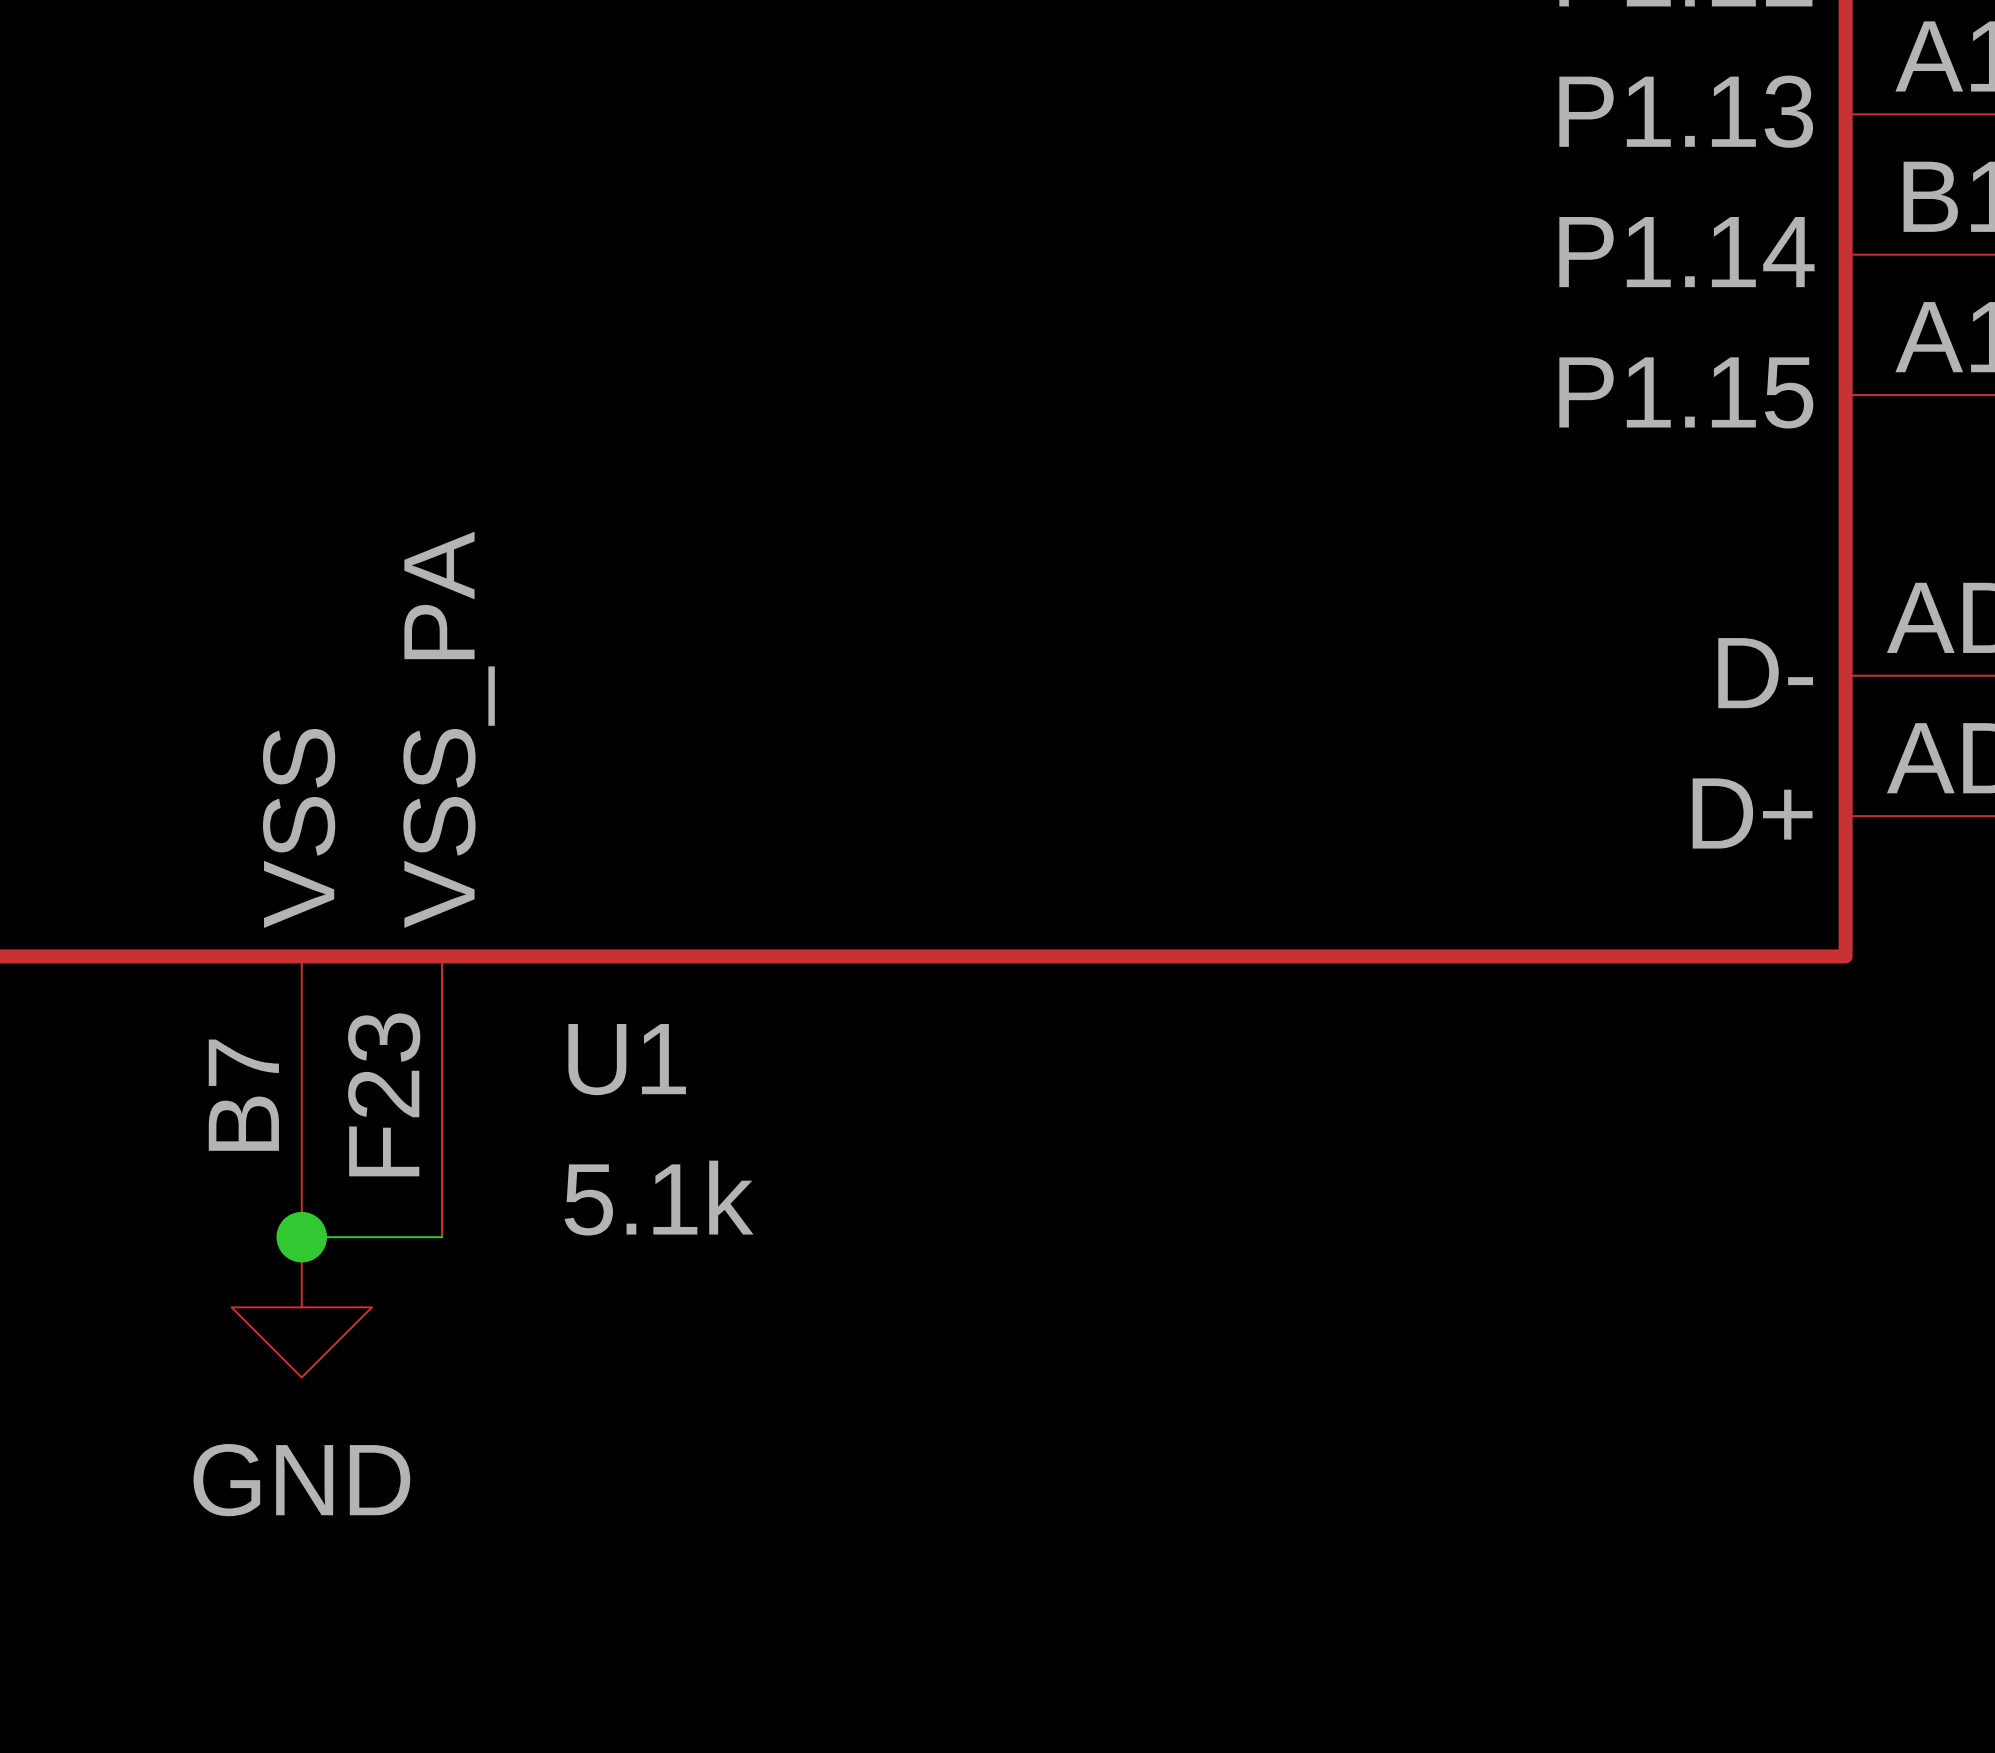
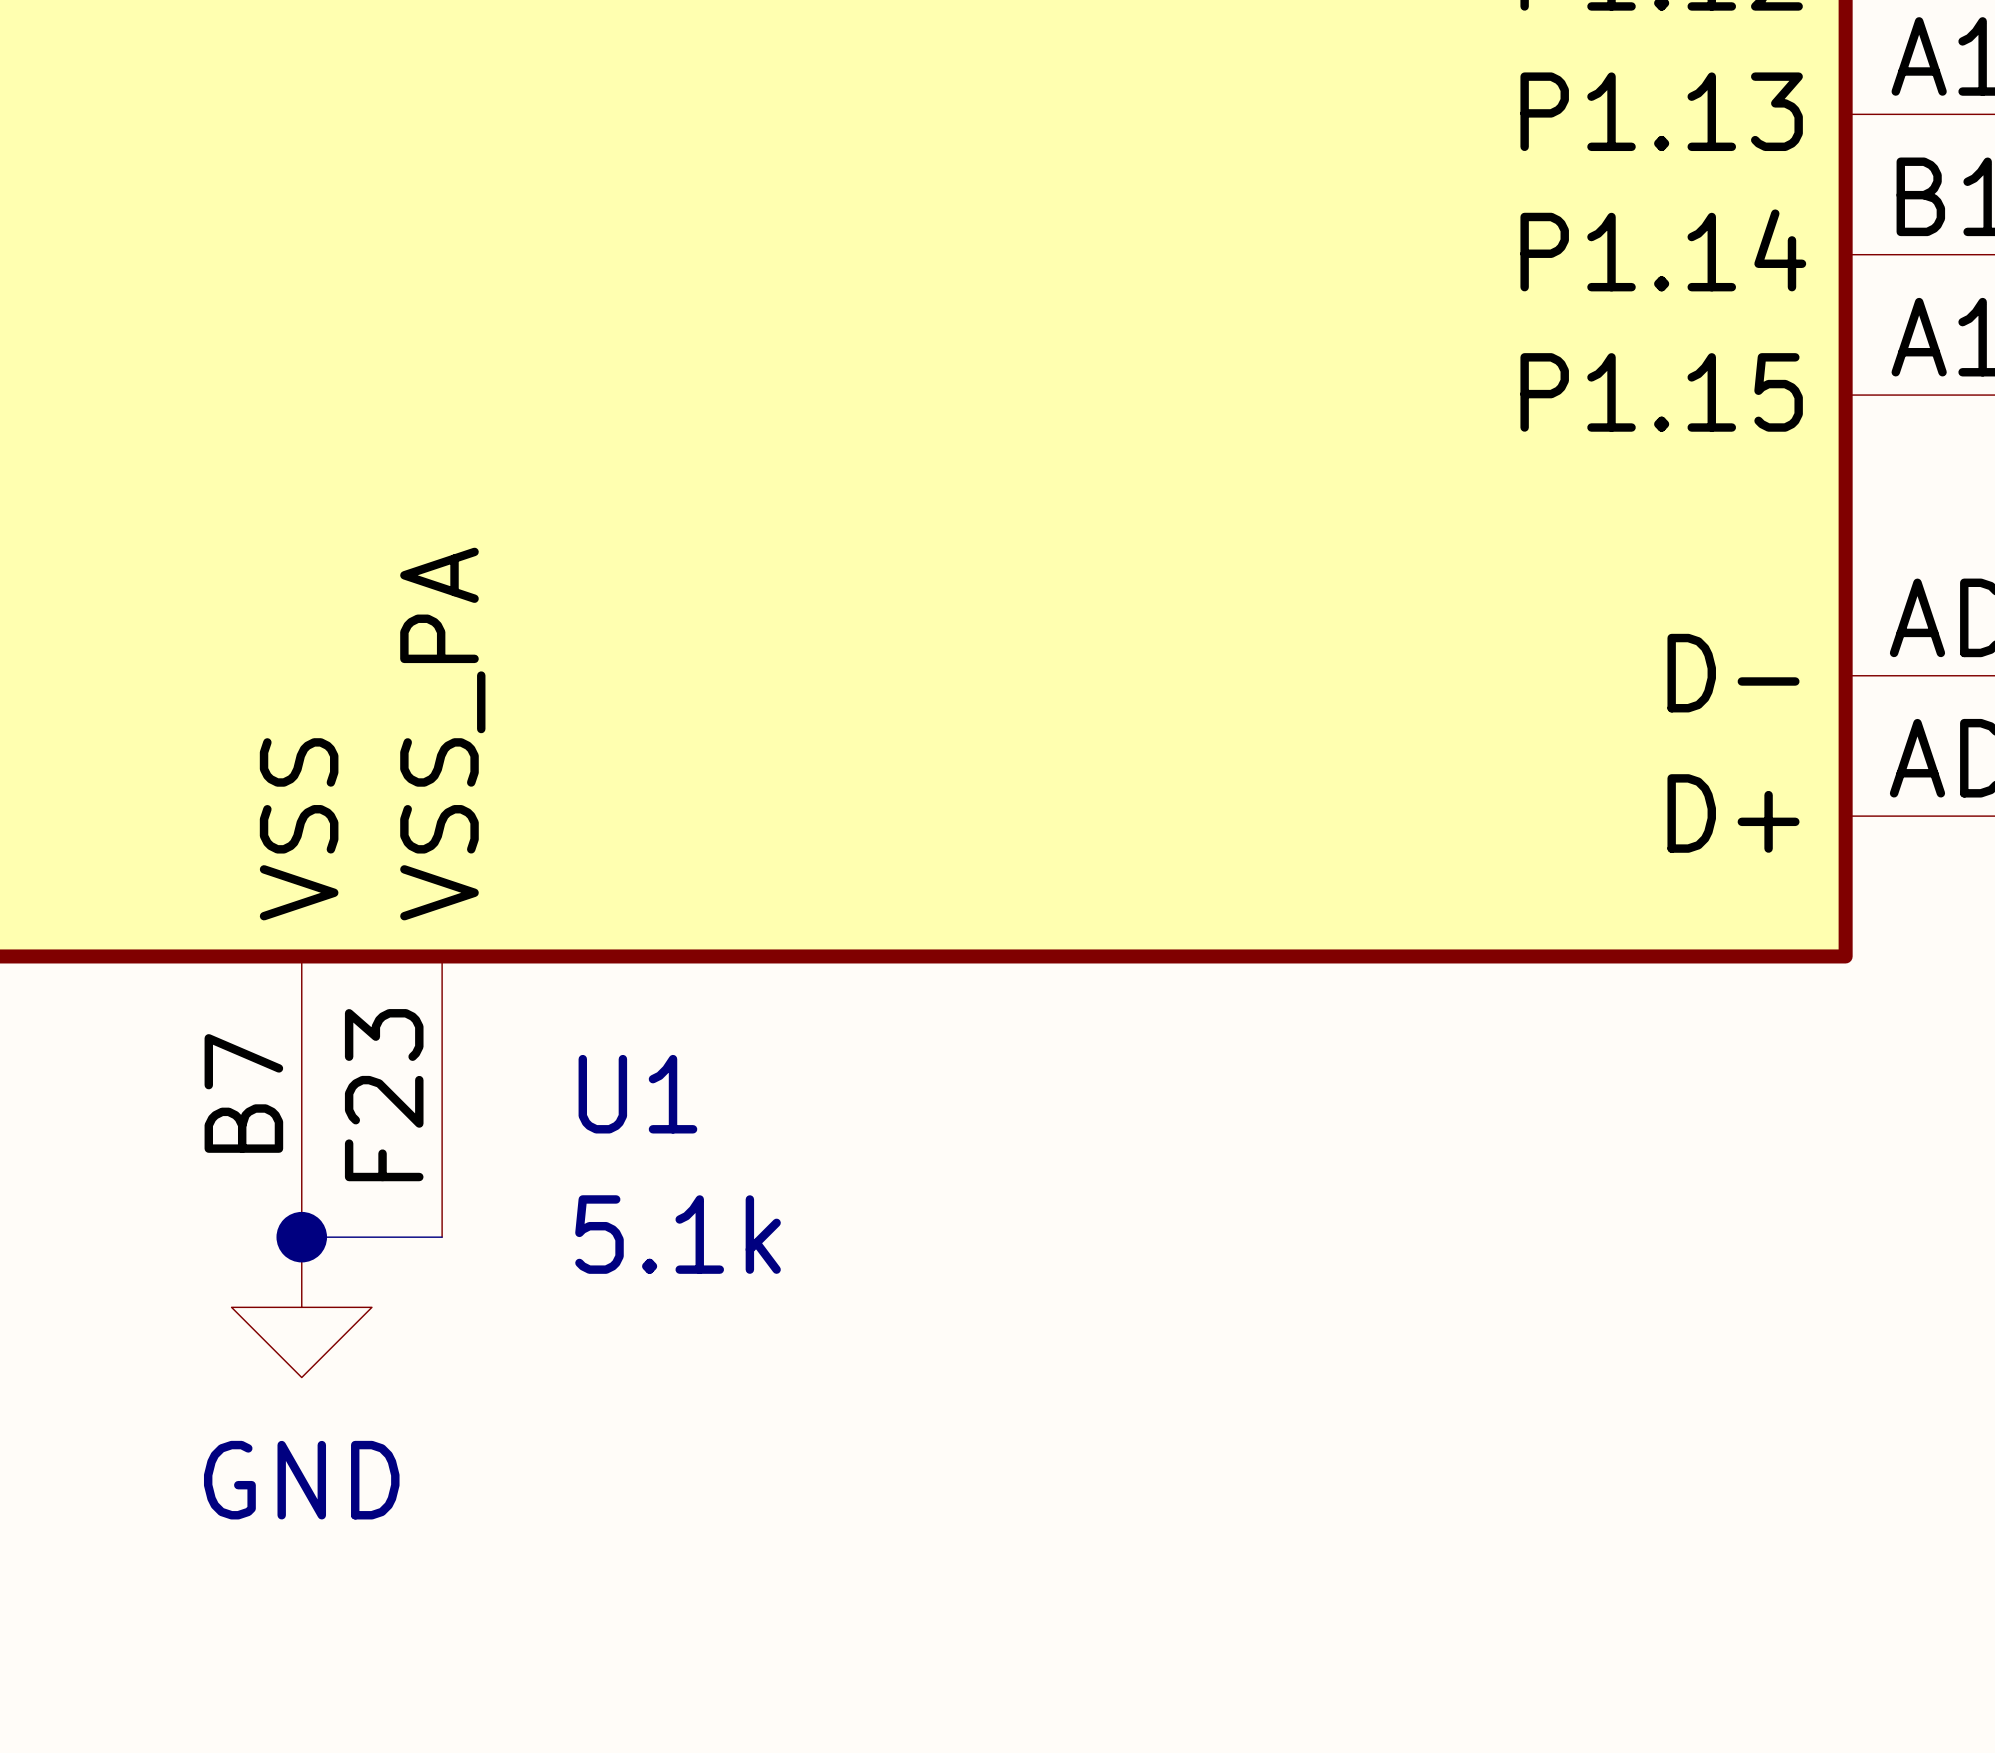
U1 name position: U1 (627, 1059) -> U1 (637, 1094)
U1 value position: 5.1k (659, 1198) -> 5.1k (678, 1234)

